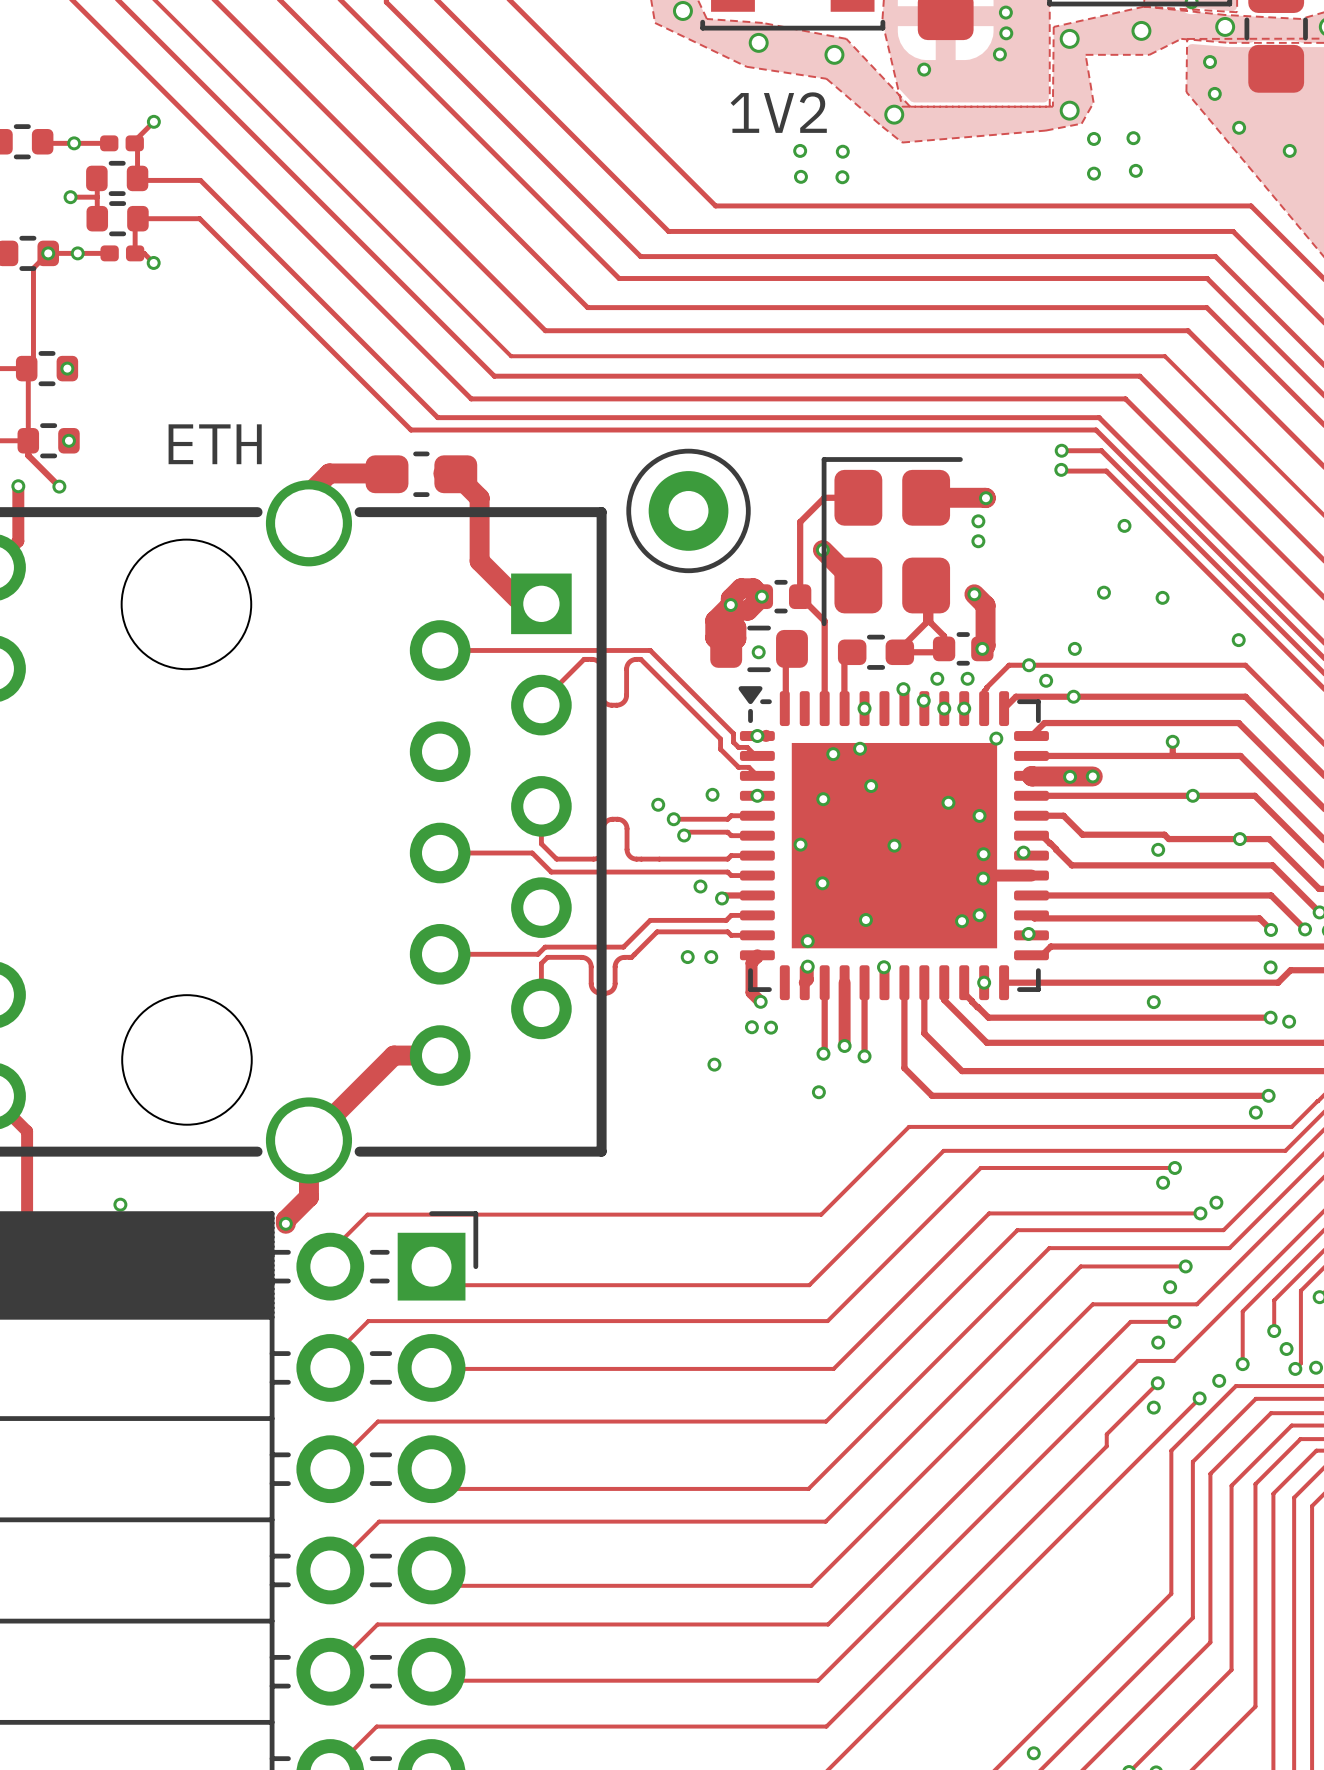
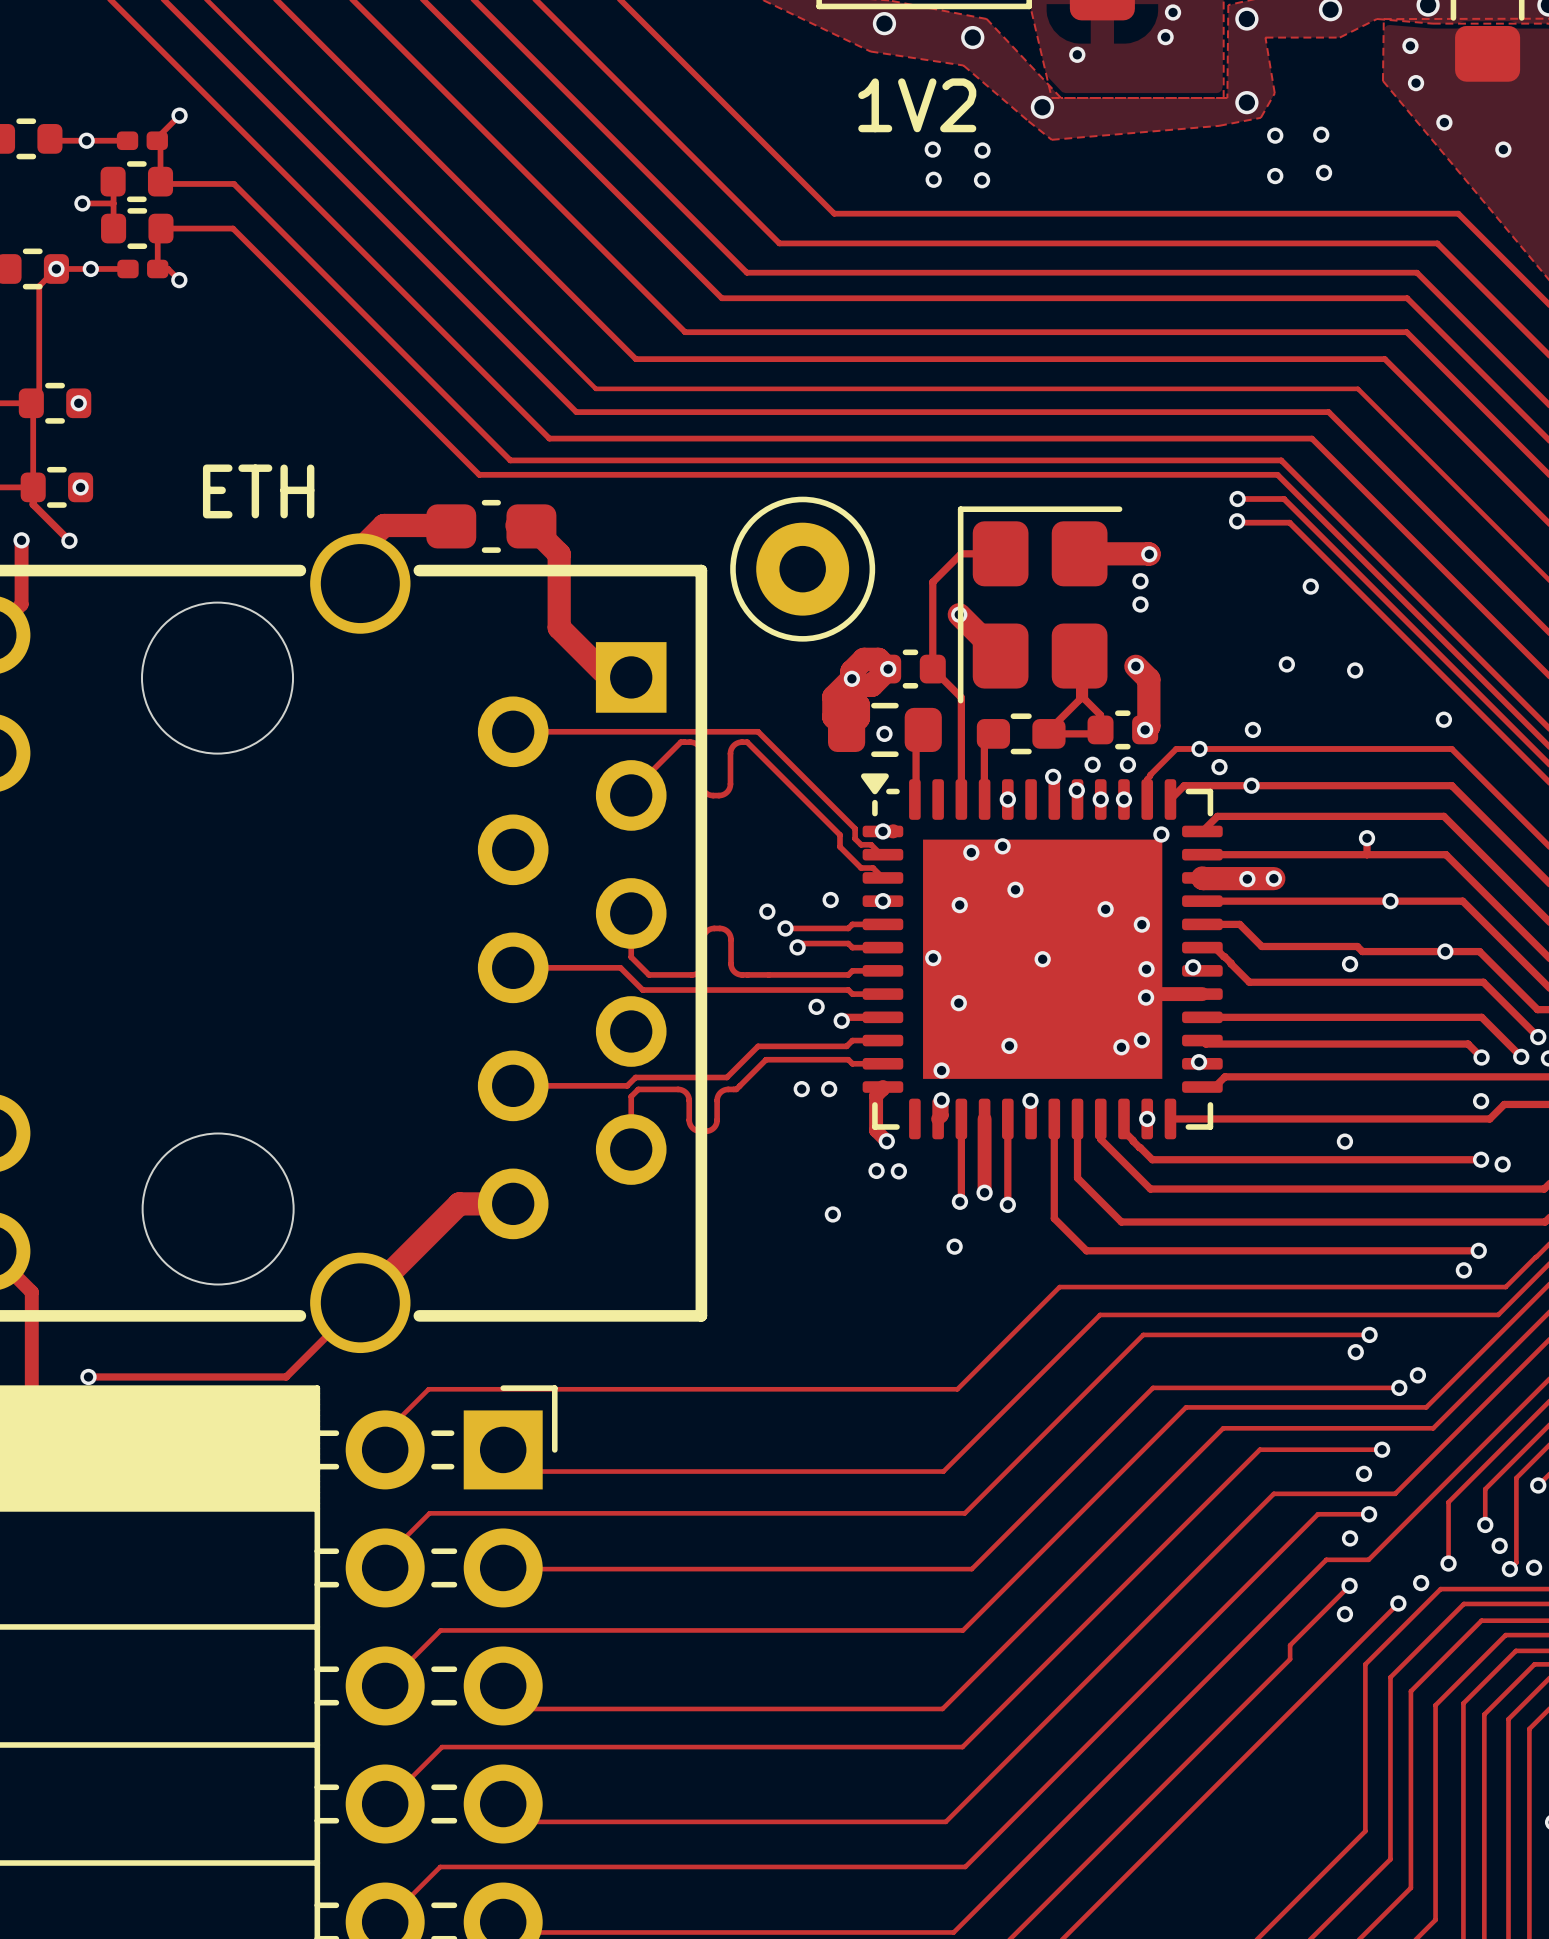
track: (308, 1140) (308, 1197) (285, 1220) (285, 1223) -> (360, 1302) (286, 1376) (88, 1376)
via position: (120, 1204) -> (88, 1376)
via: (285, 1223) -> none

